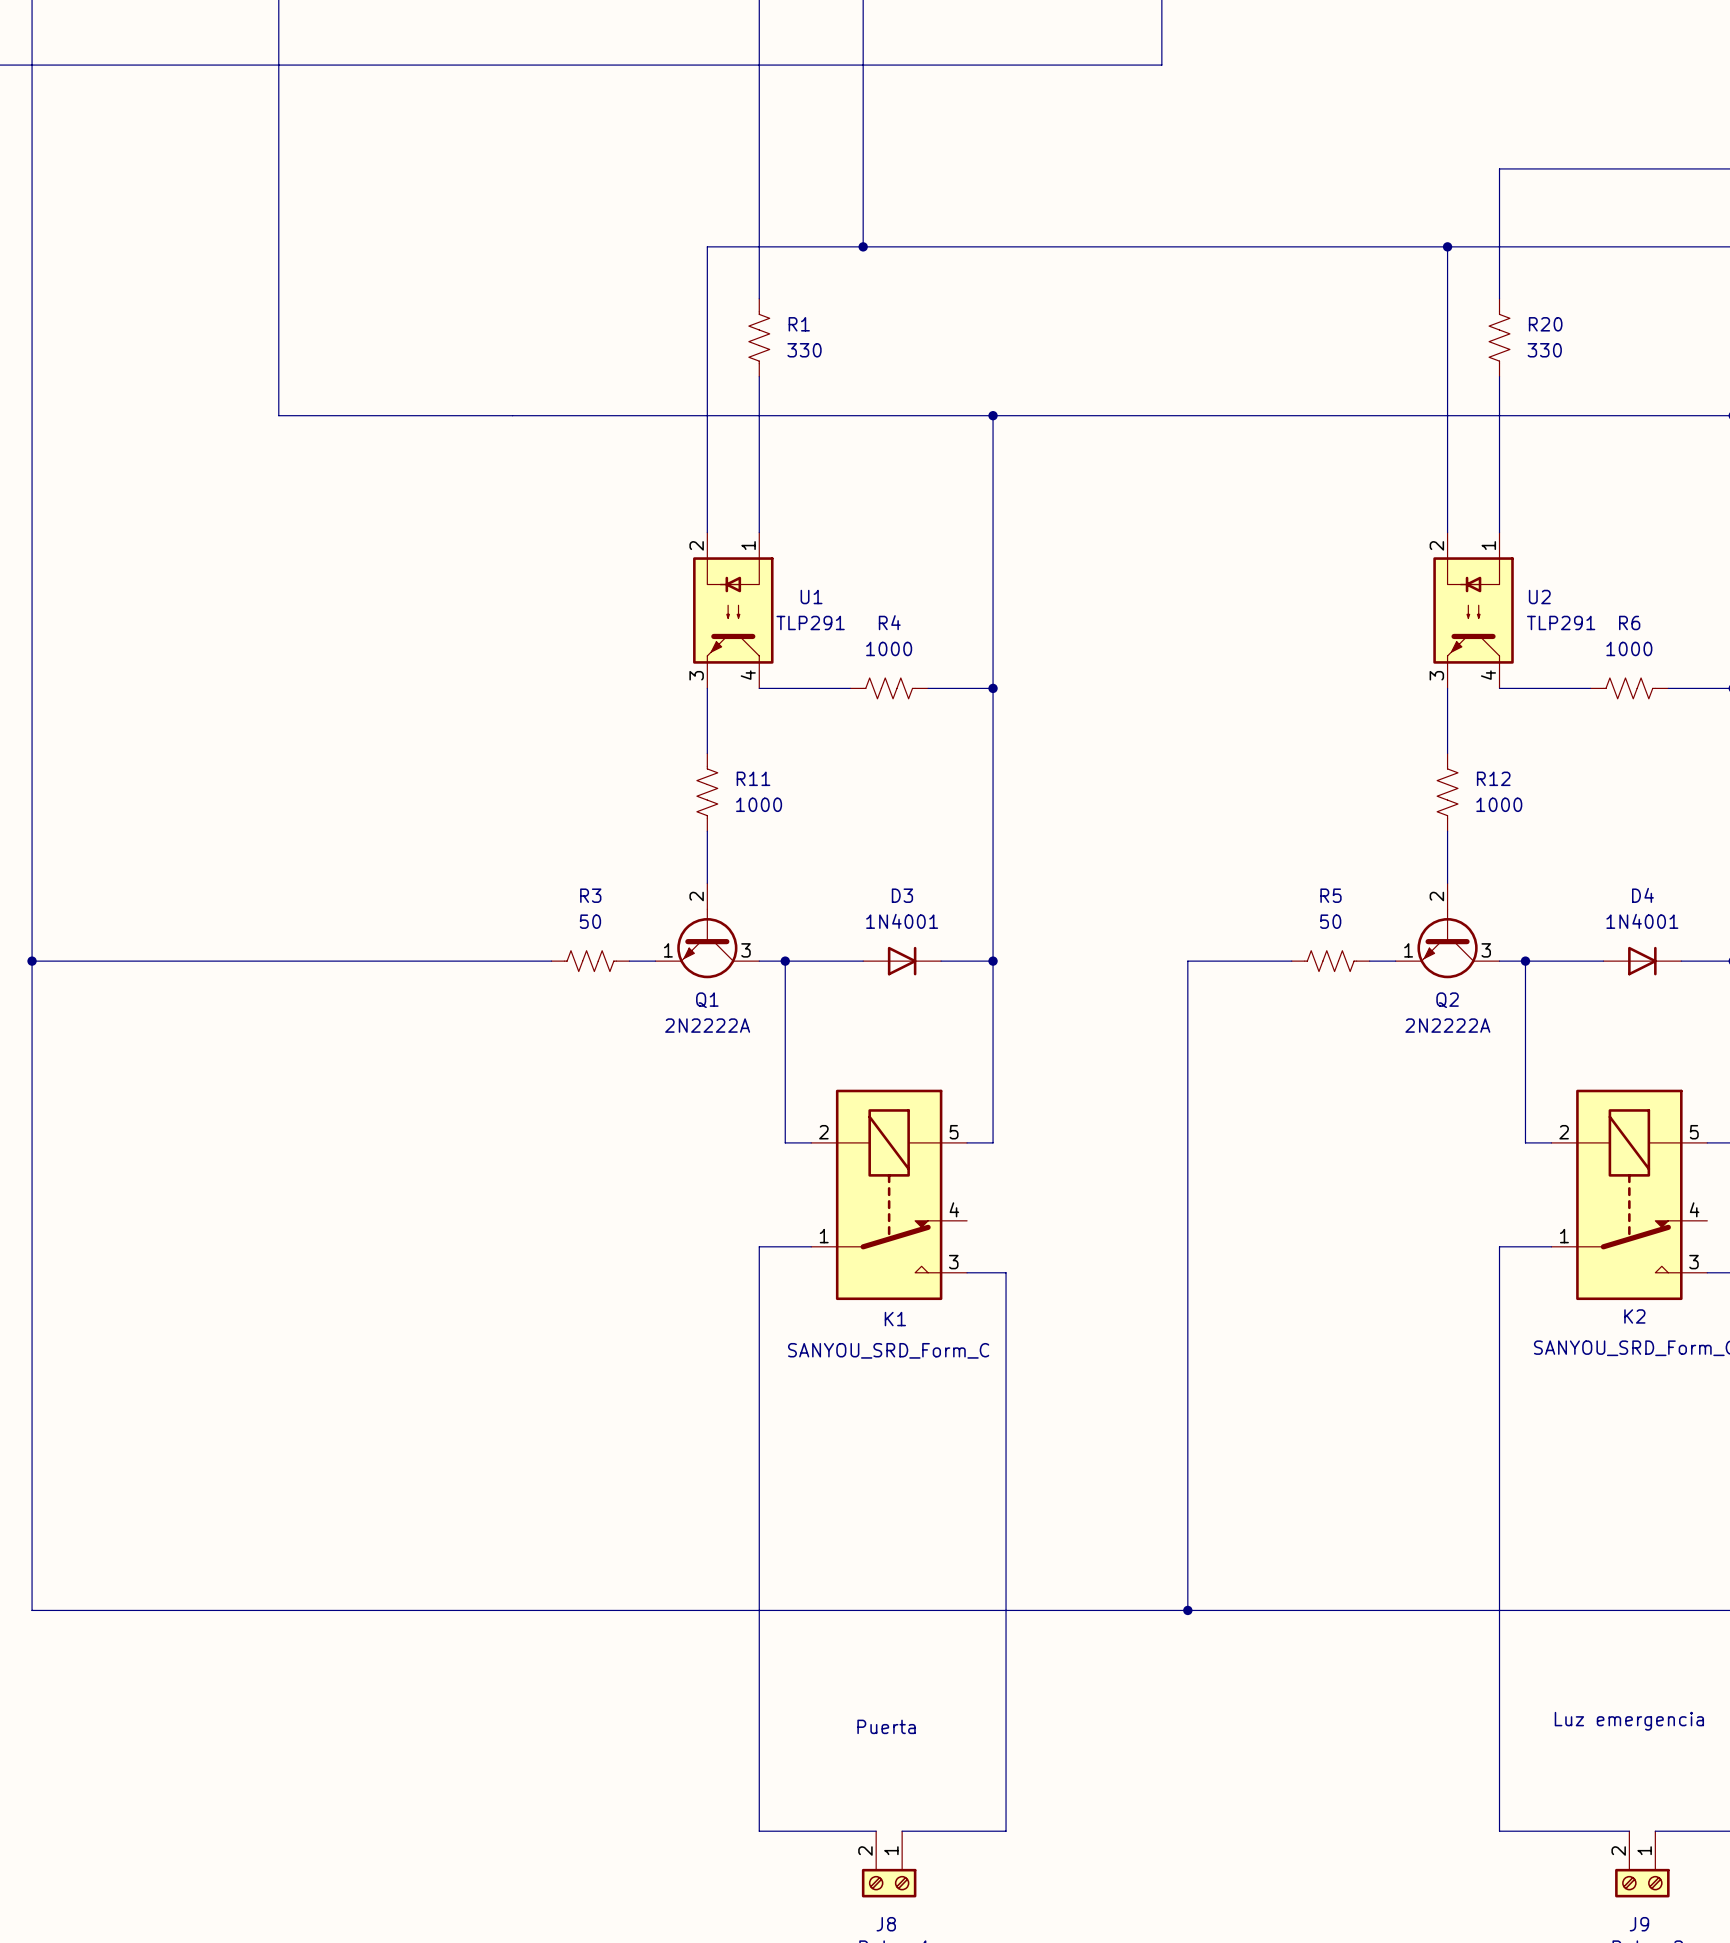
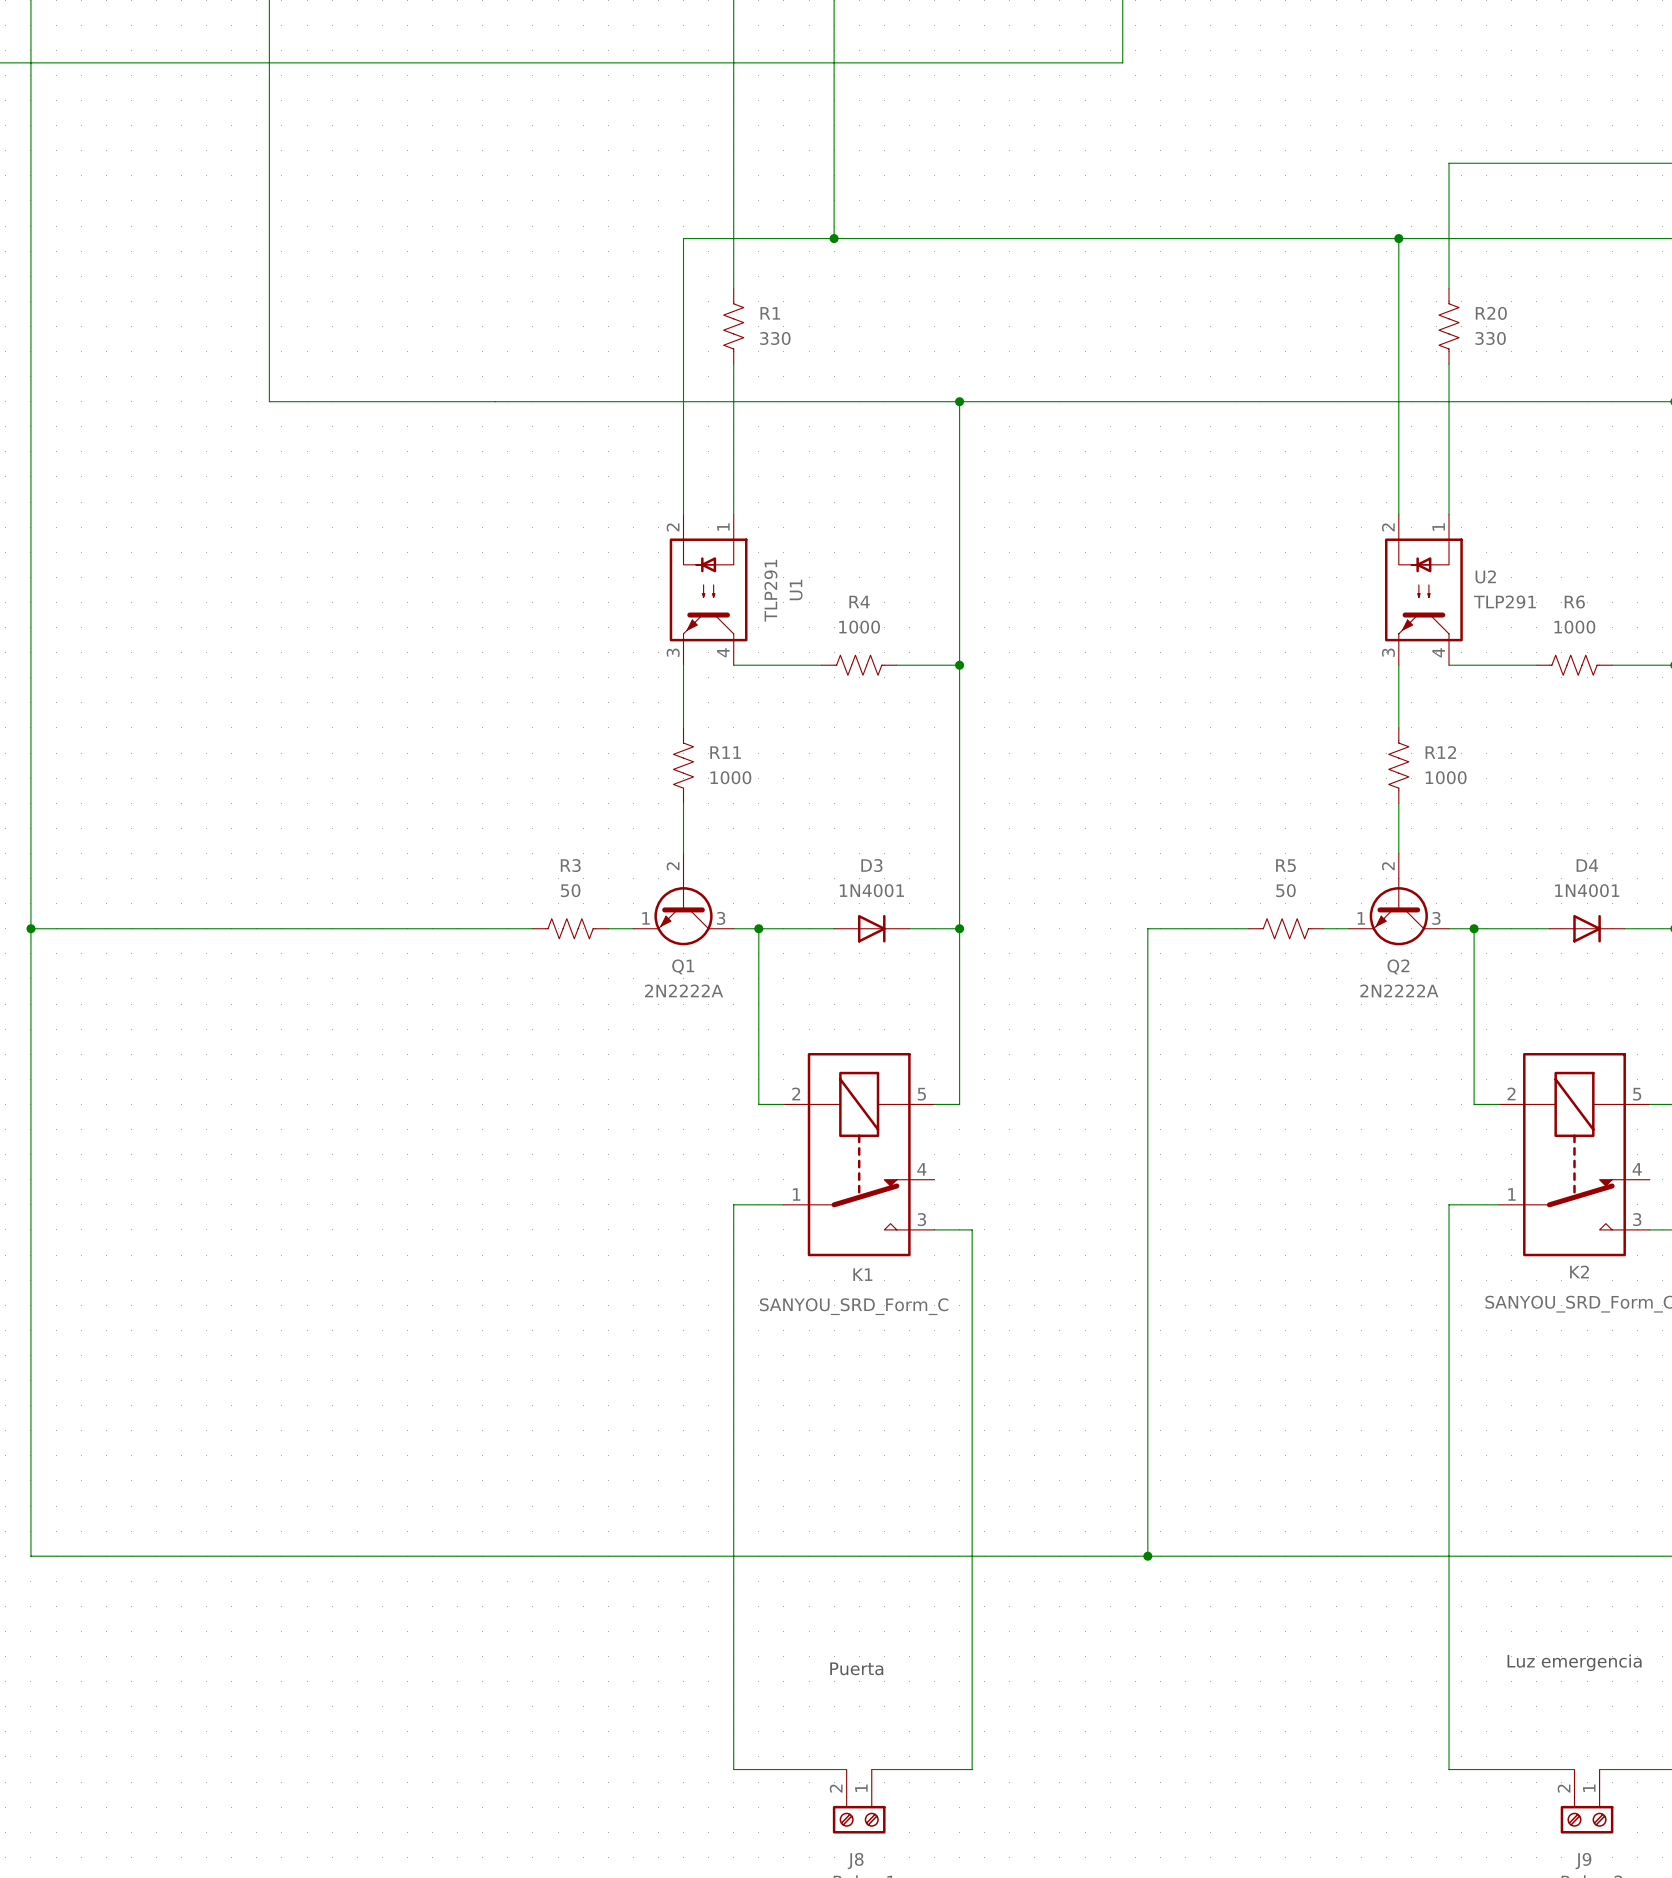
U1 name rotation: 0° (811, 597) -> 90° counterclockwise (796, 589)
U1 value rotation: 0° (810, 622) -> 90° counterclockwise (770, 590)

